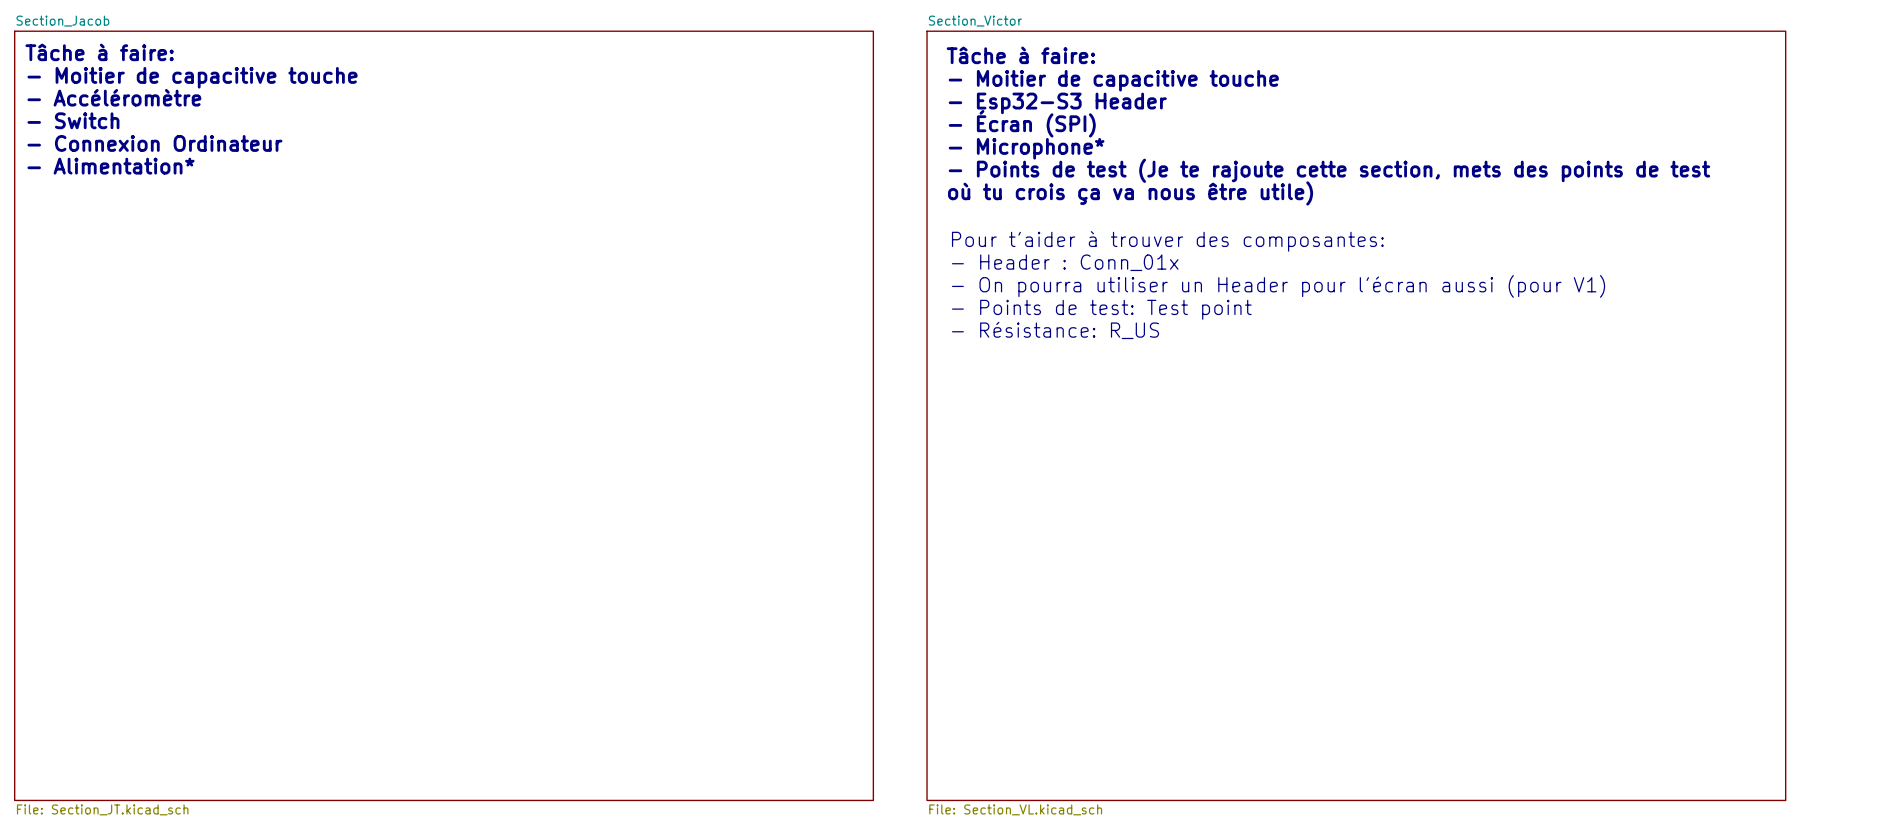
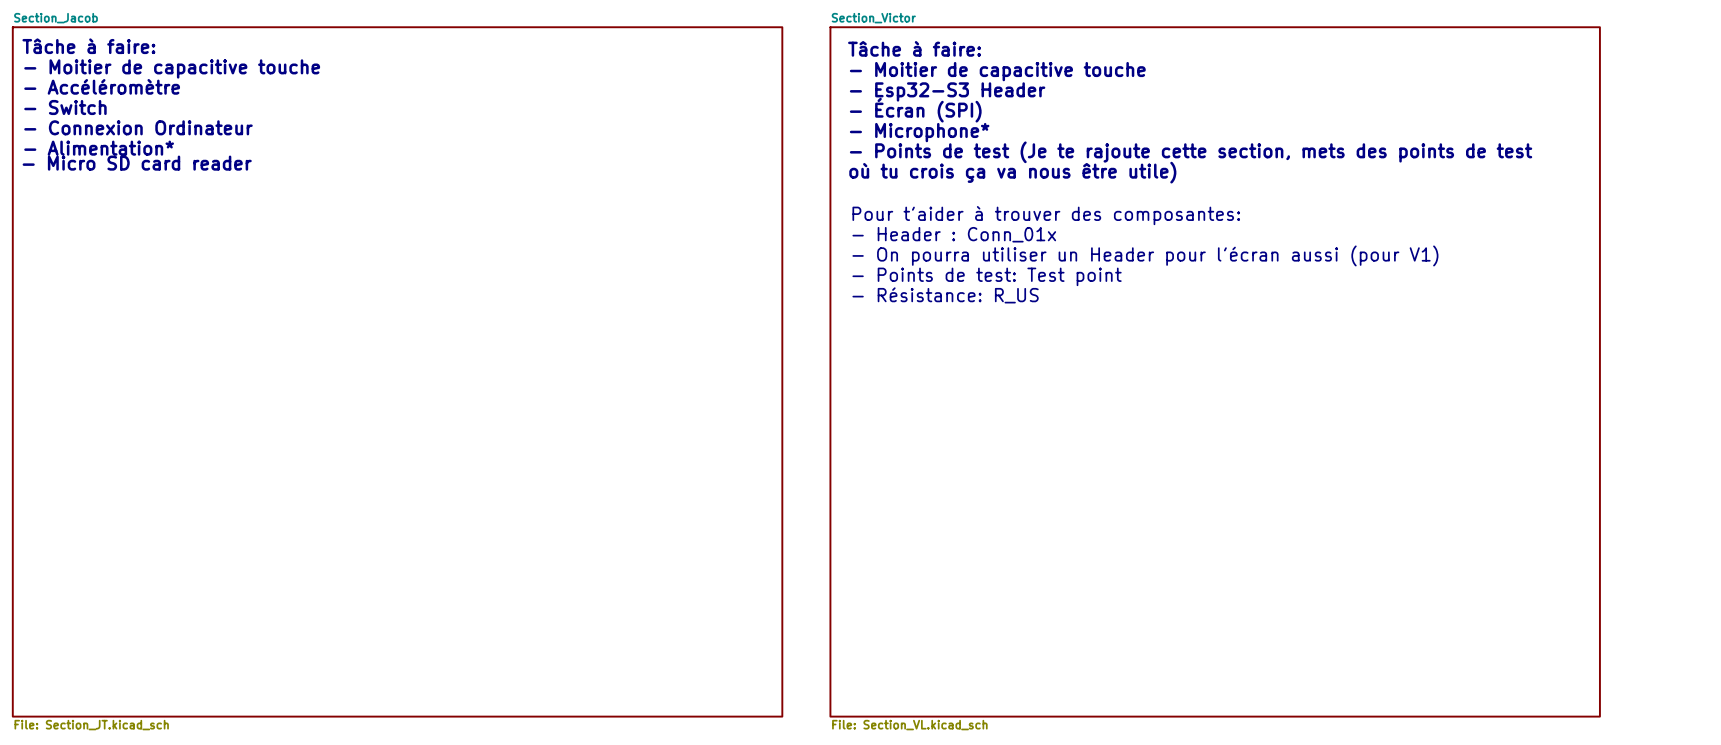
text: none -> - Micro SD card reader (137, 163)

